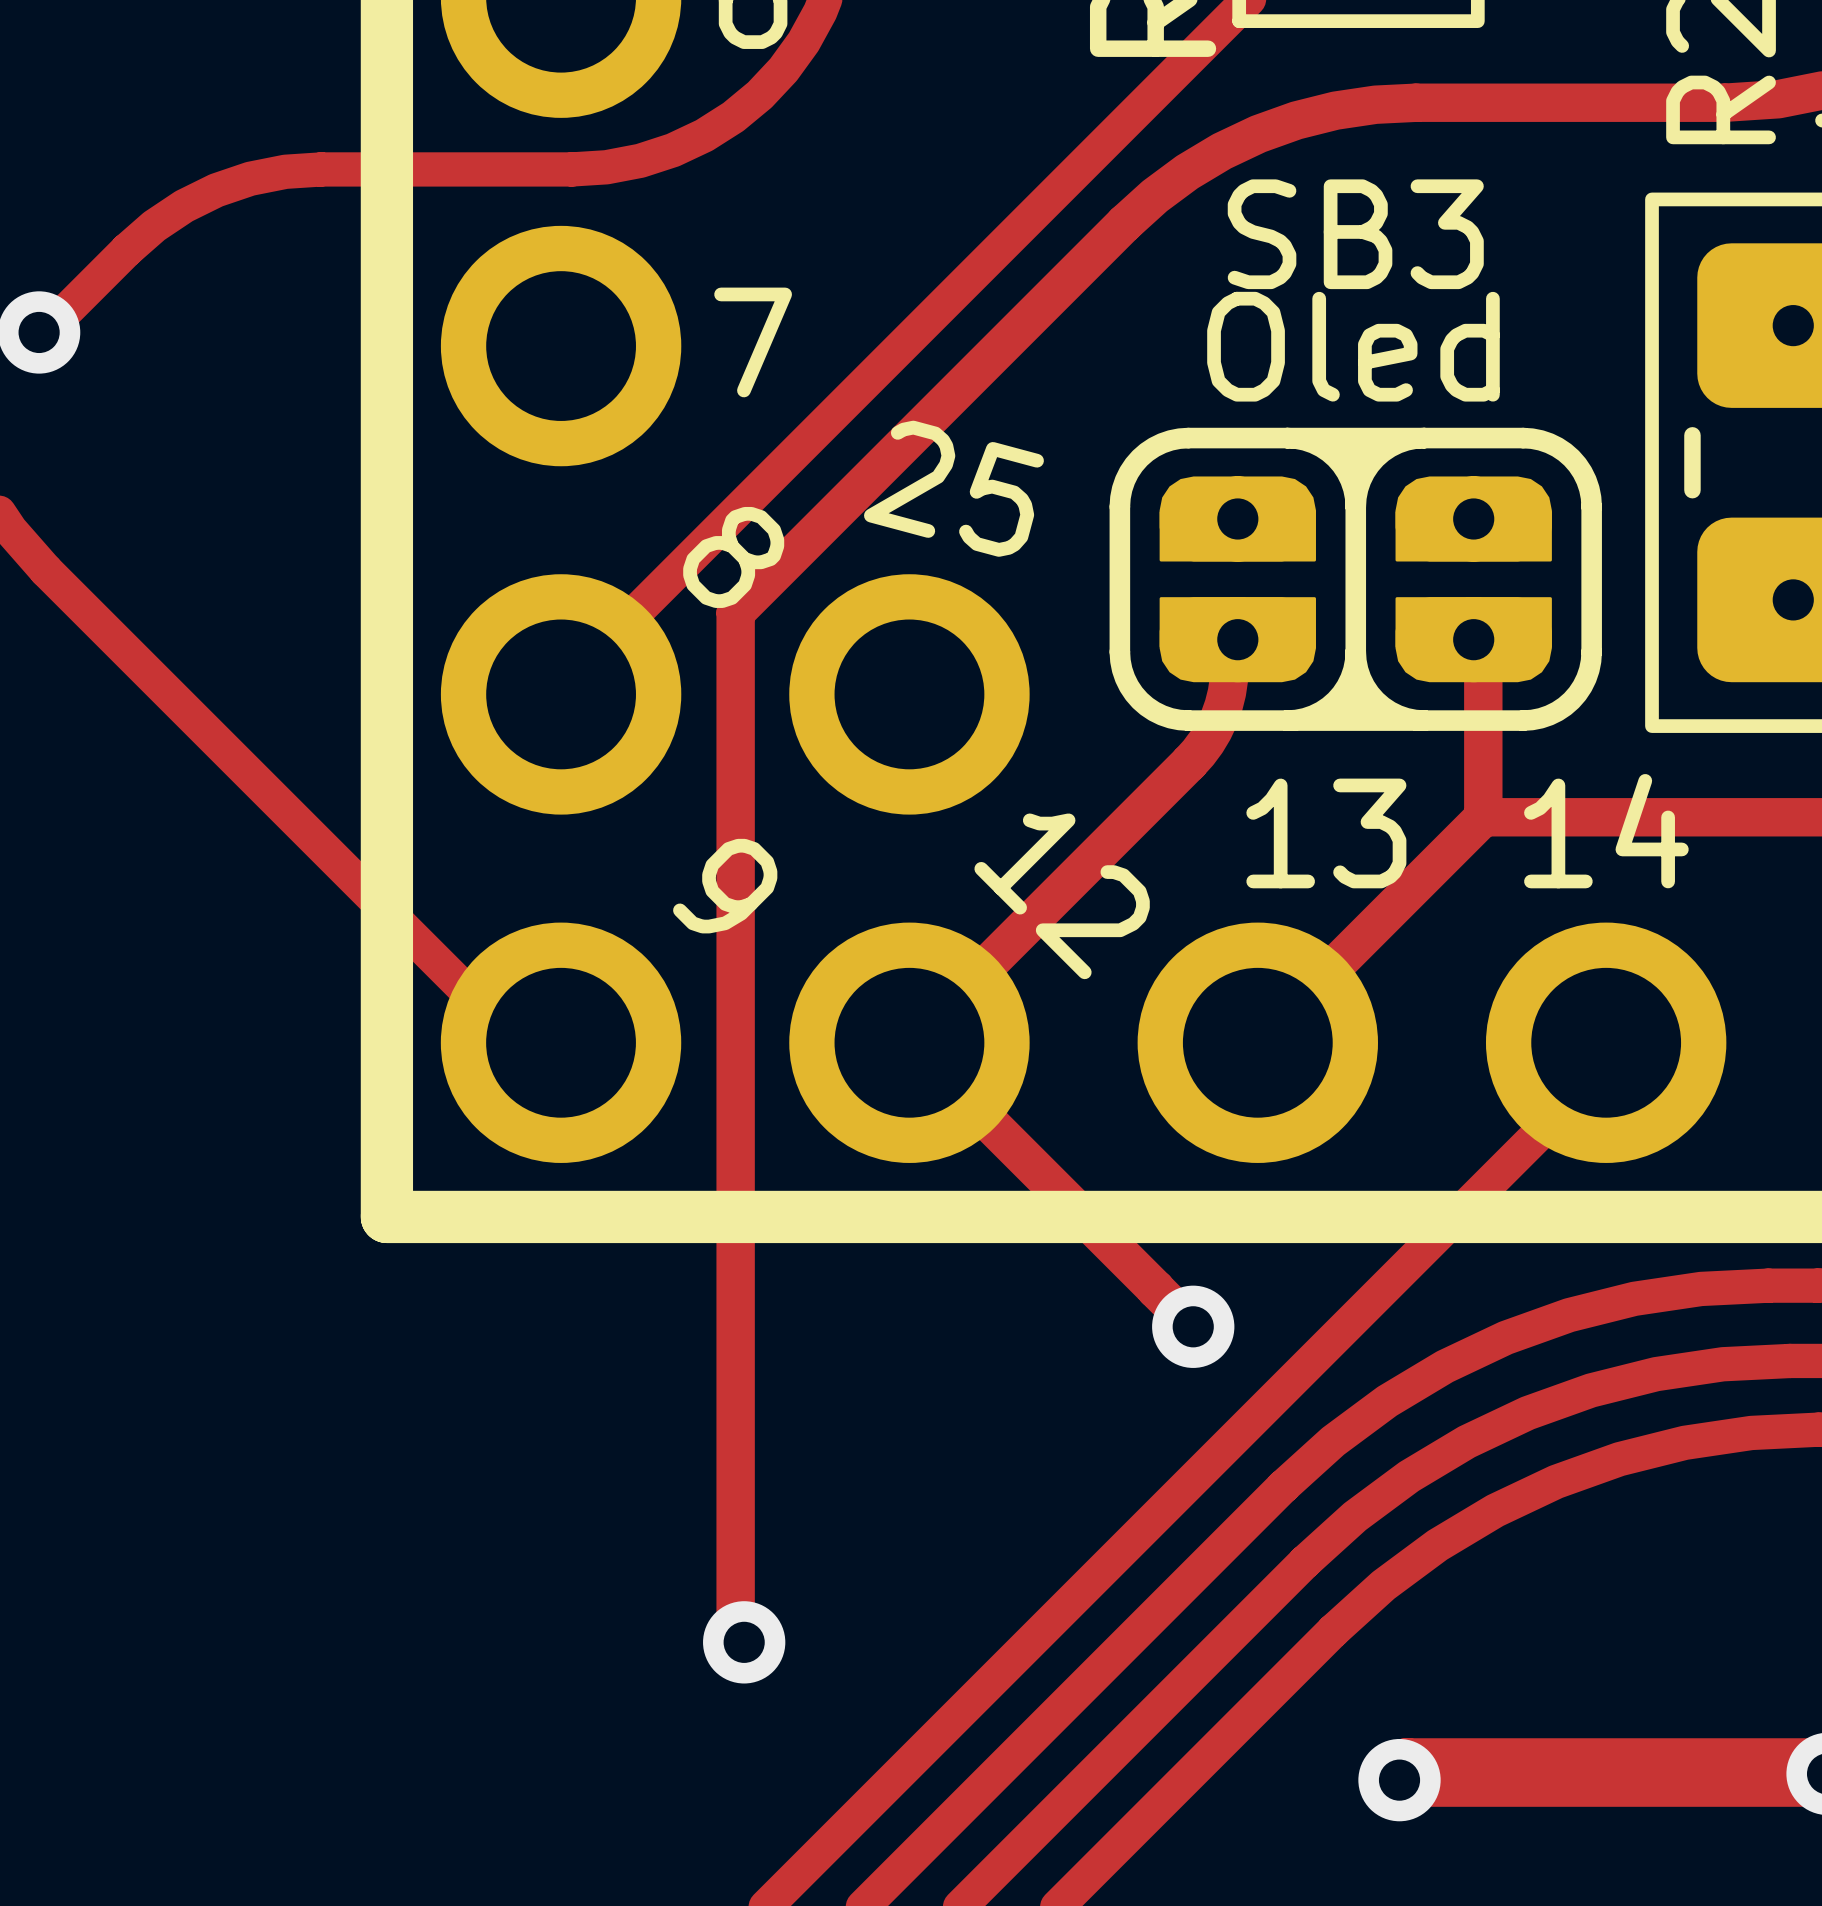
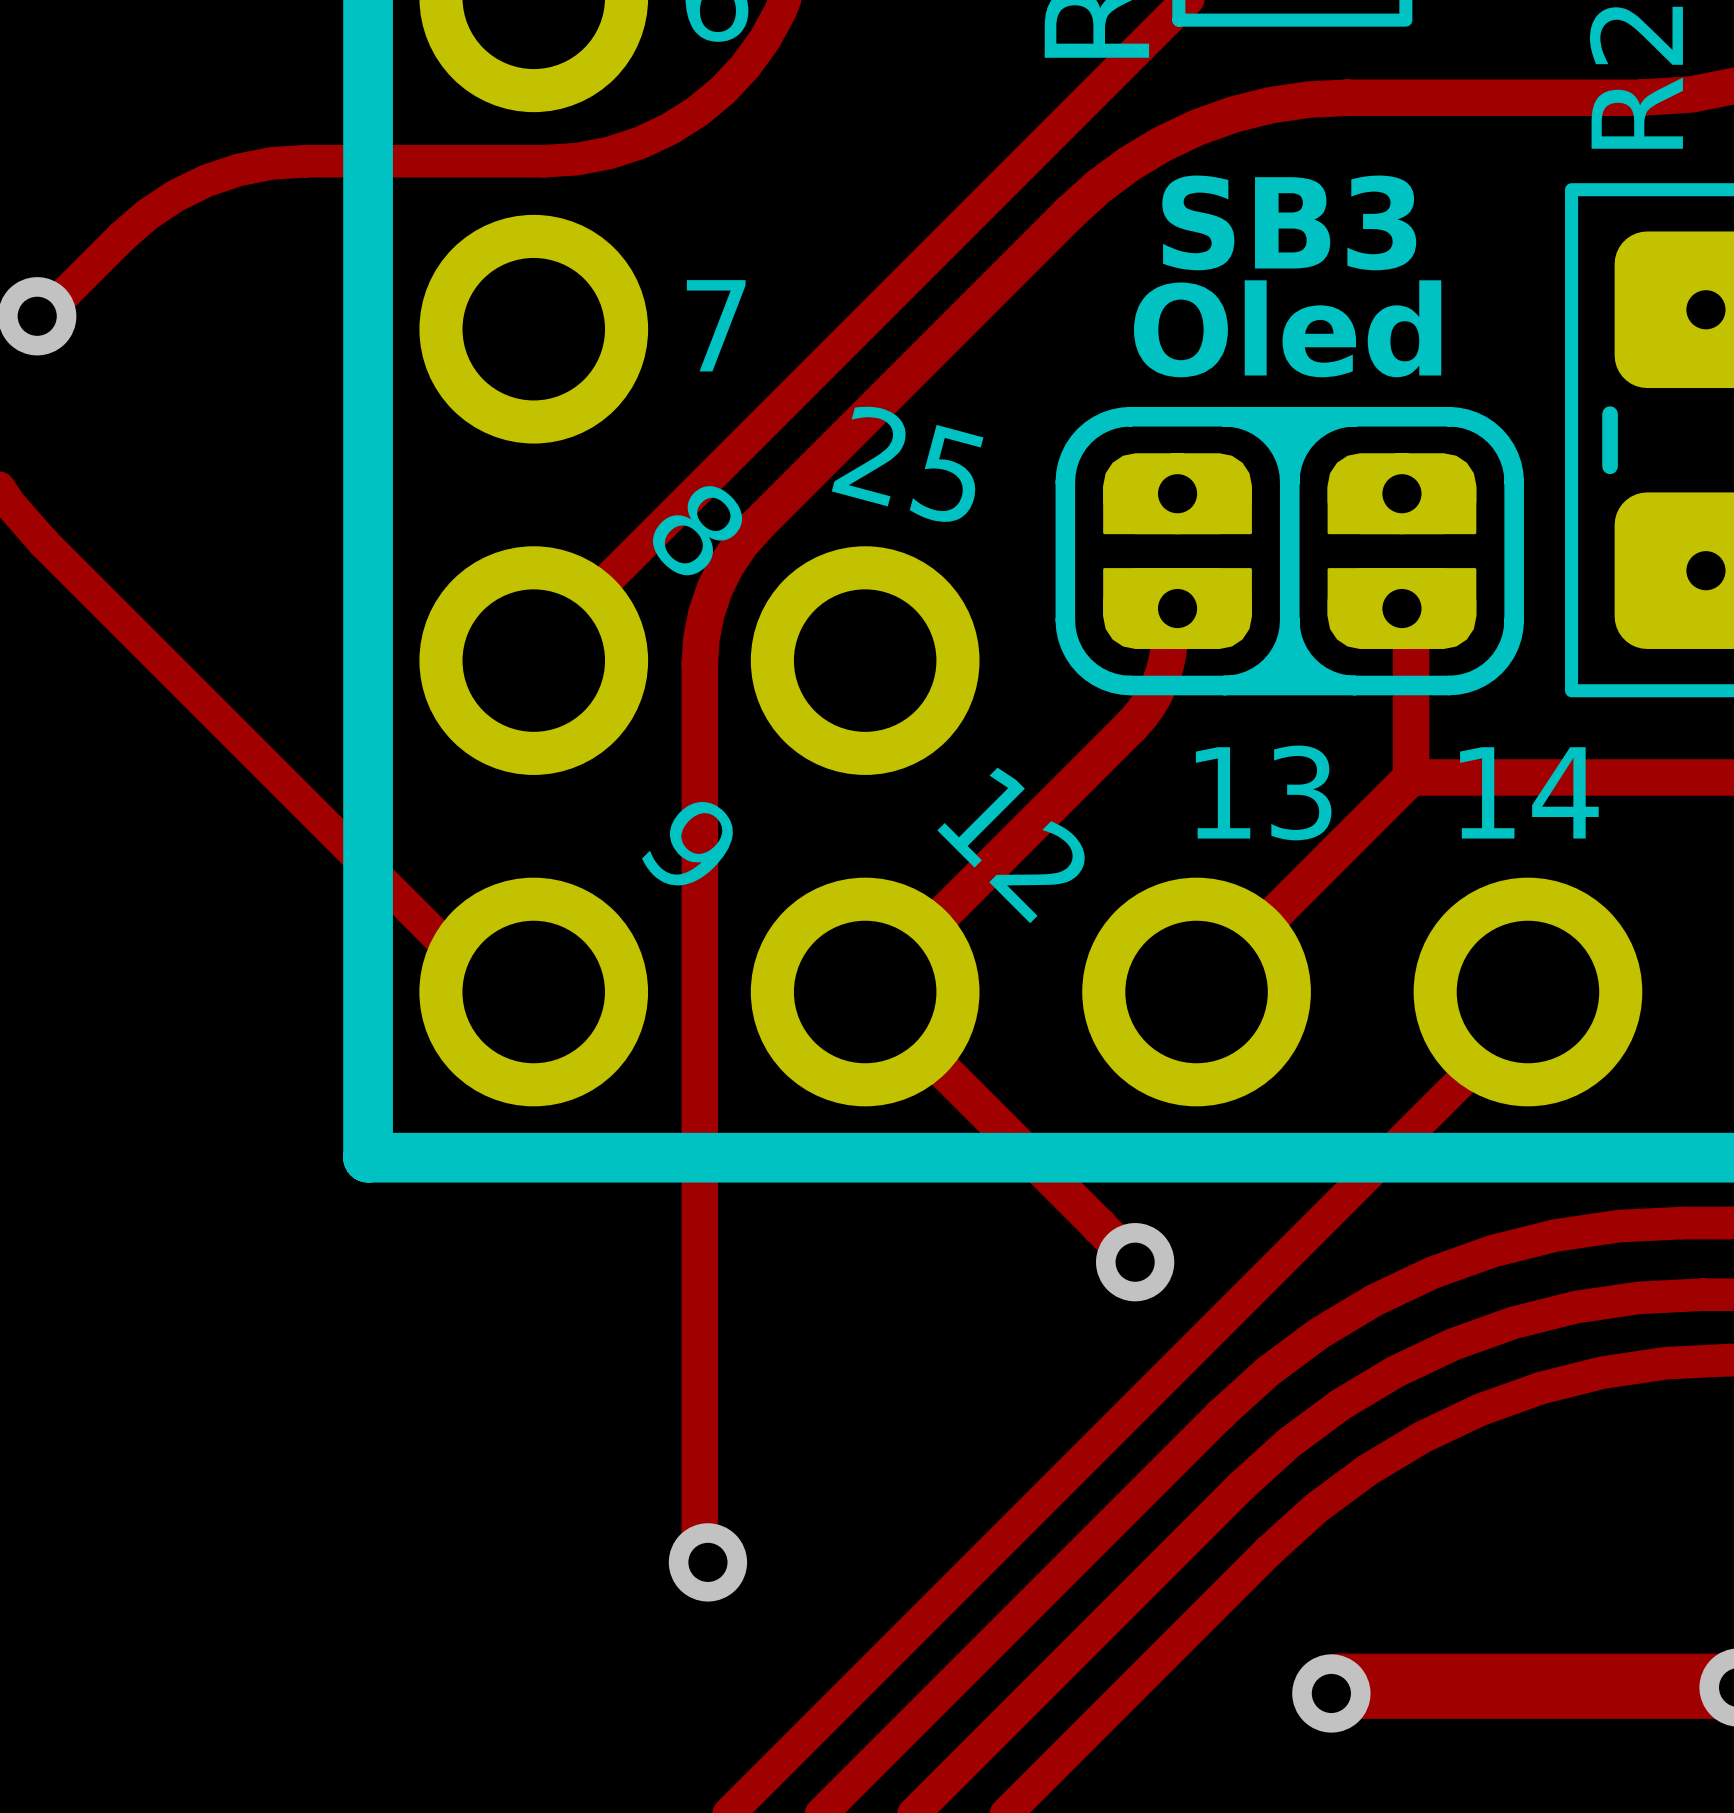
track: (795, 552) (735, 612) (735, 697) -> (757, 525) (740, 544) (726, 565) (714, 588) (706, 613) (701, 638) (699, 663)

